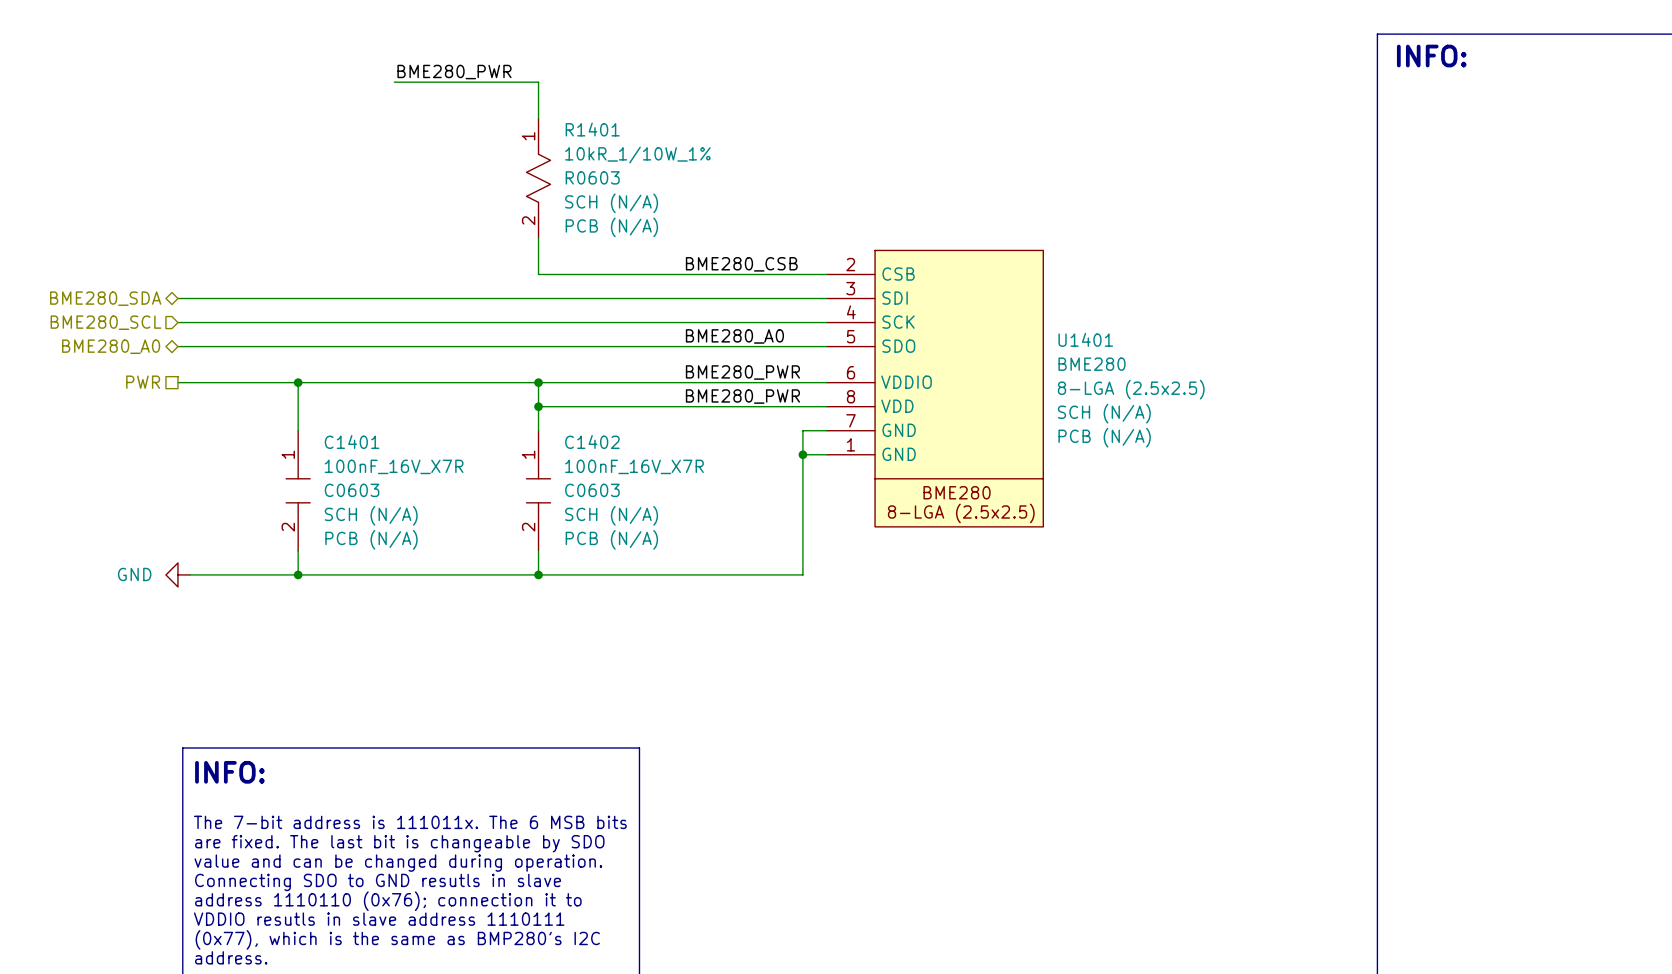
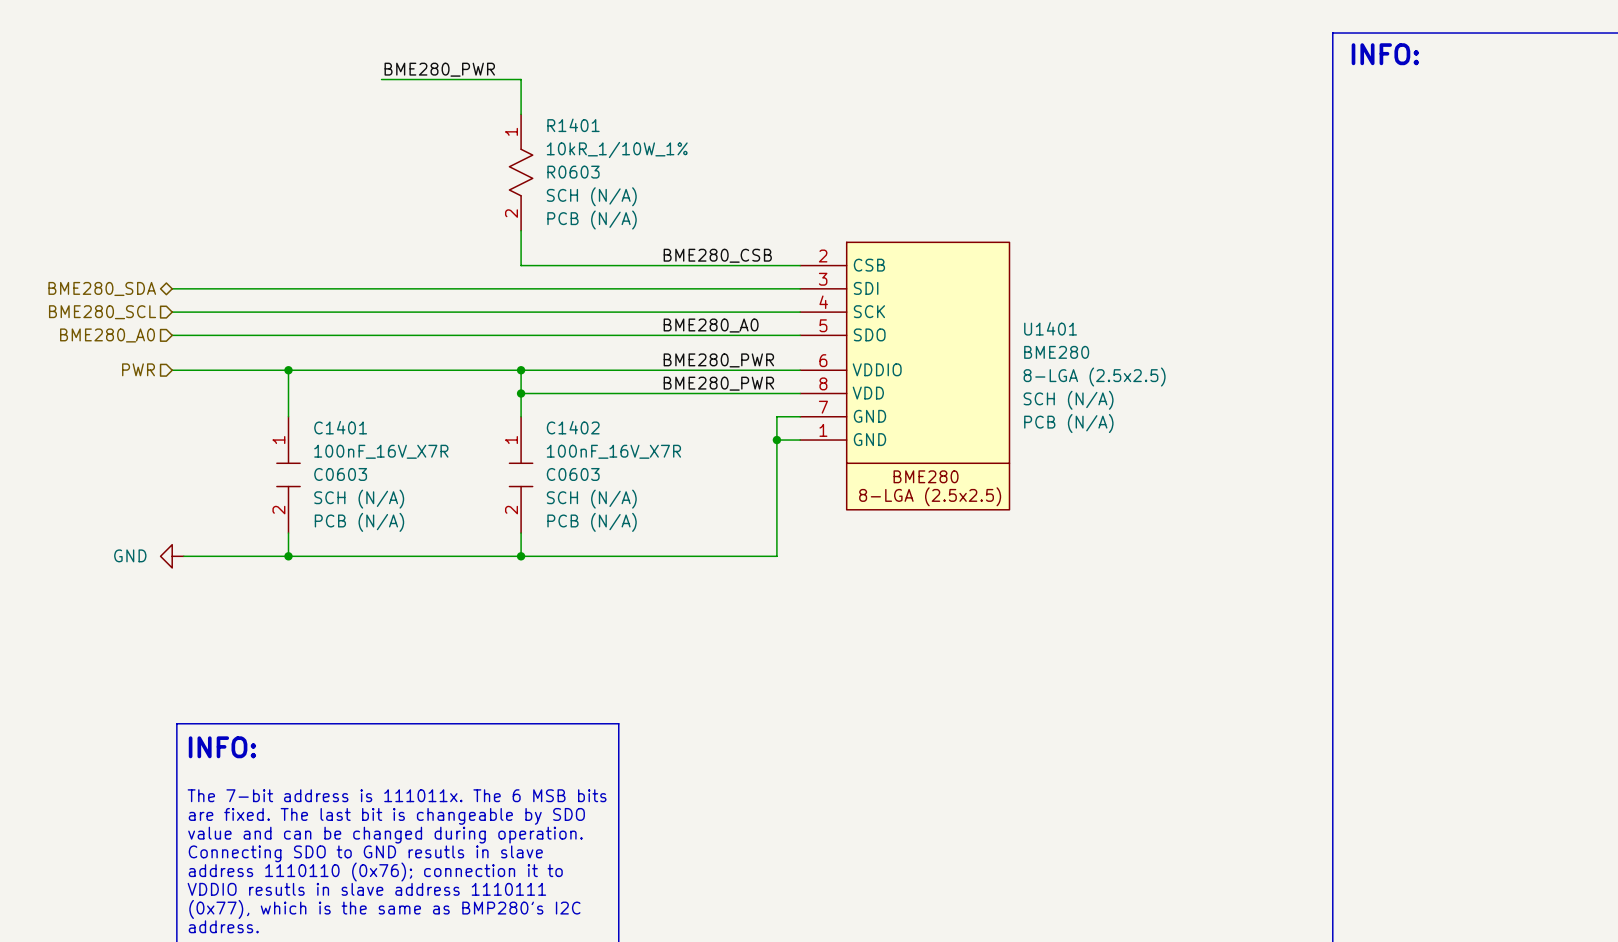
hierarchical label shape: bidirectional (111, 346) -> input (107, 335)
hierarchical label shape: passive (143, 382) -> input (138, 369)

